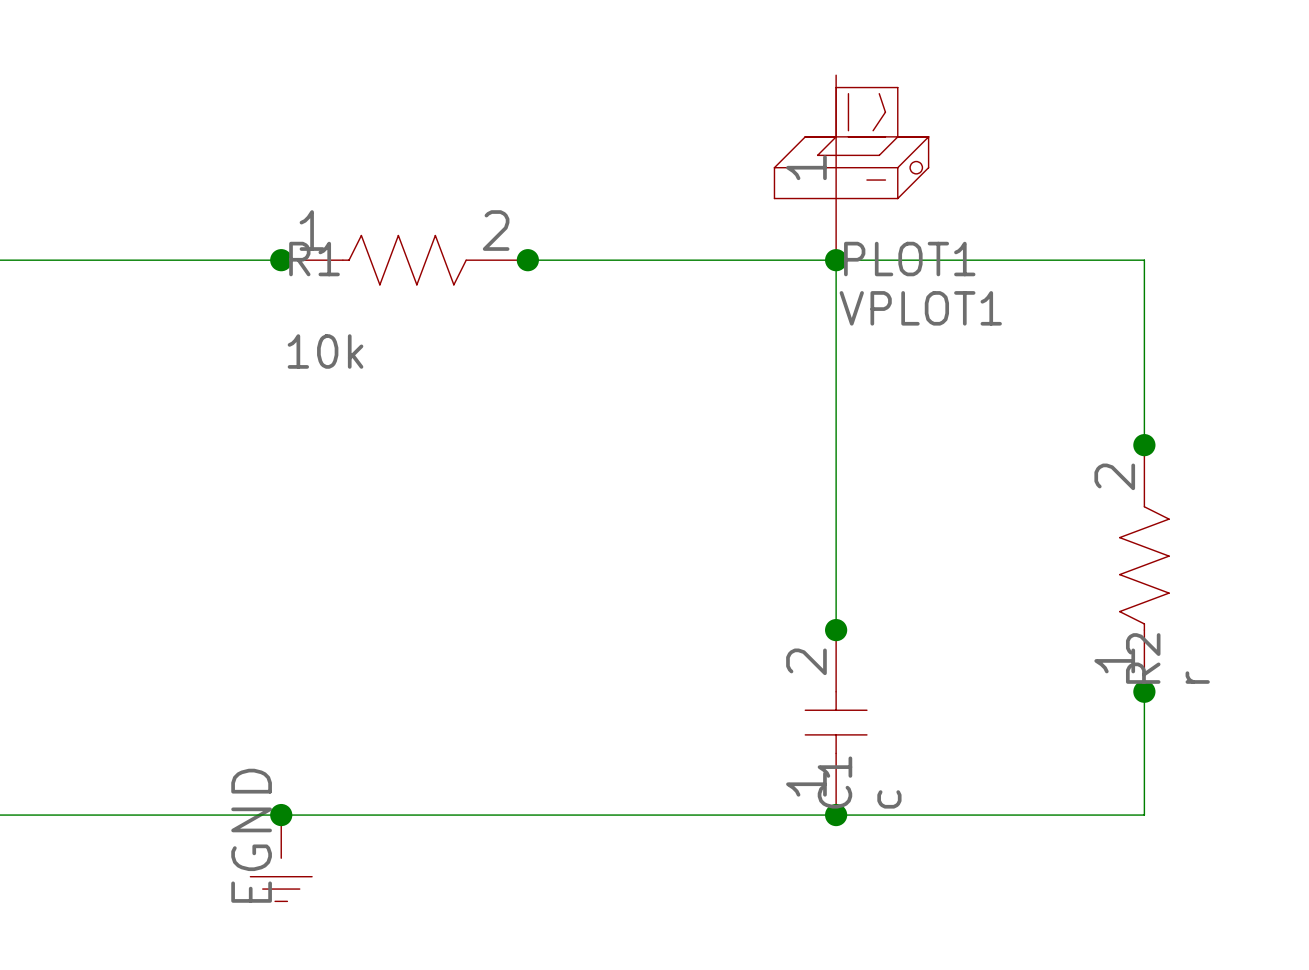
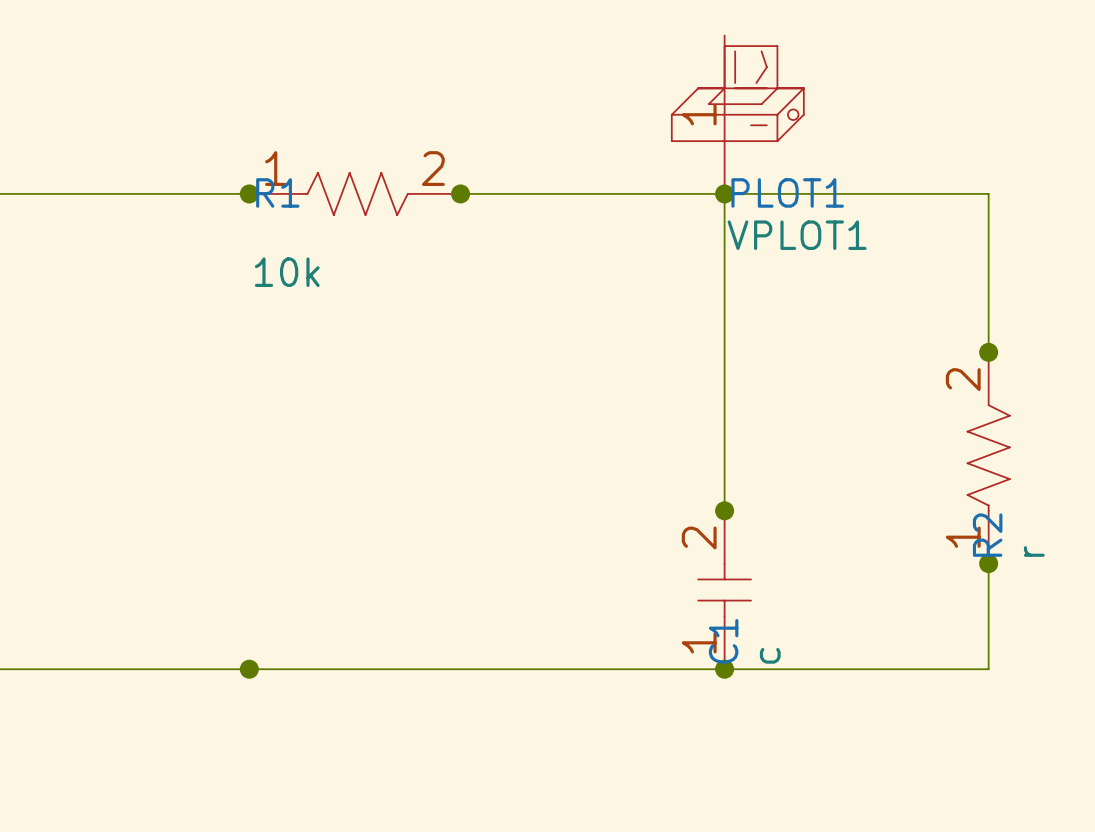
part: (281, 858) -> none

